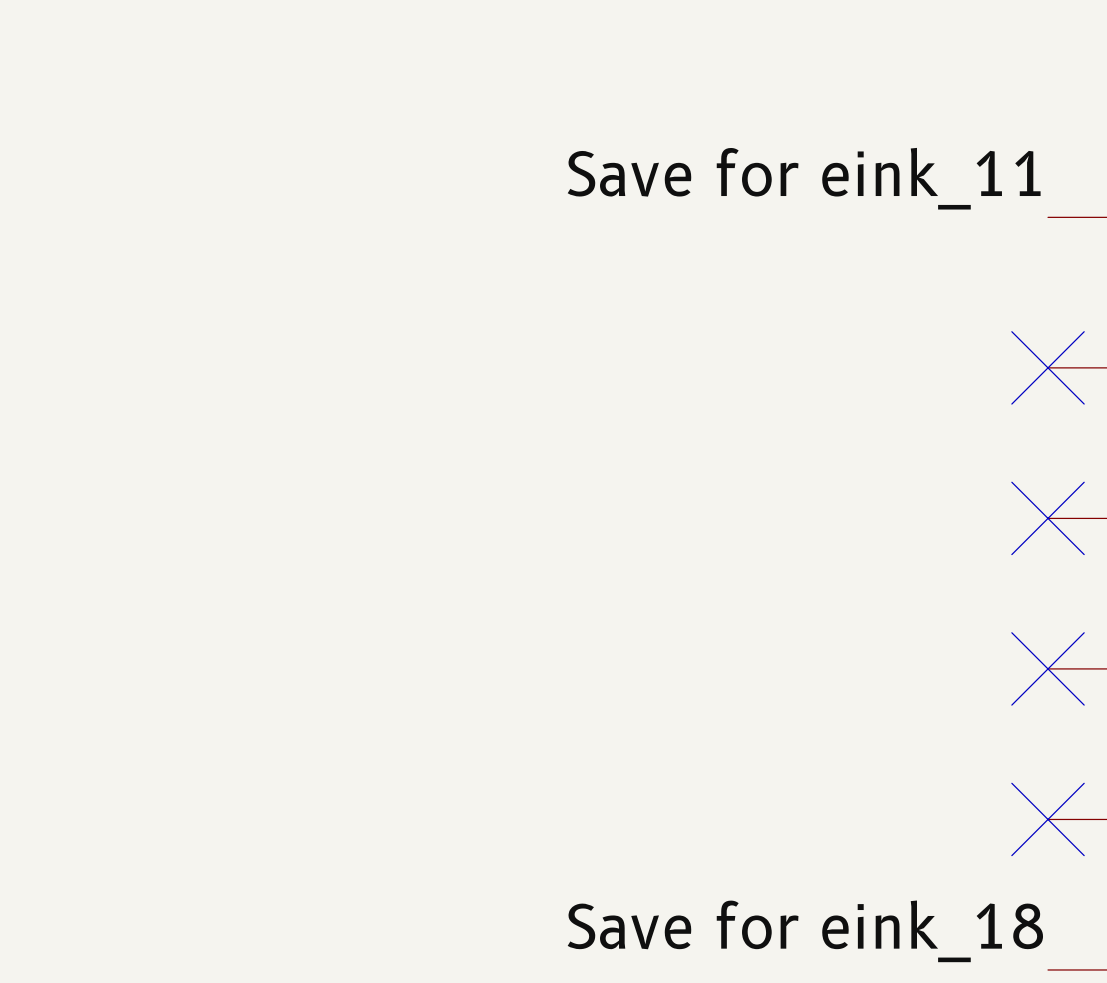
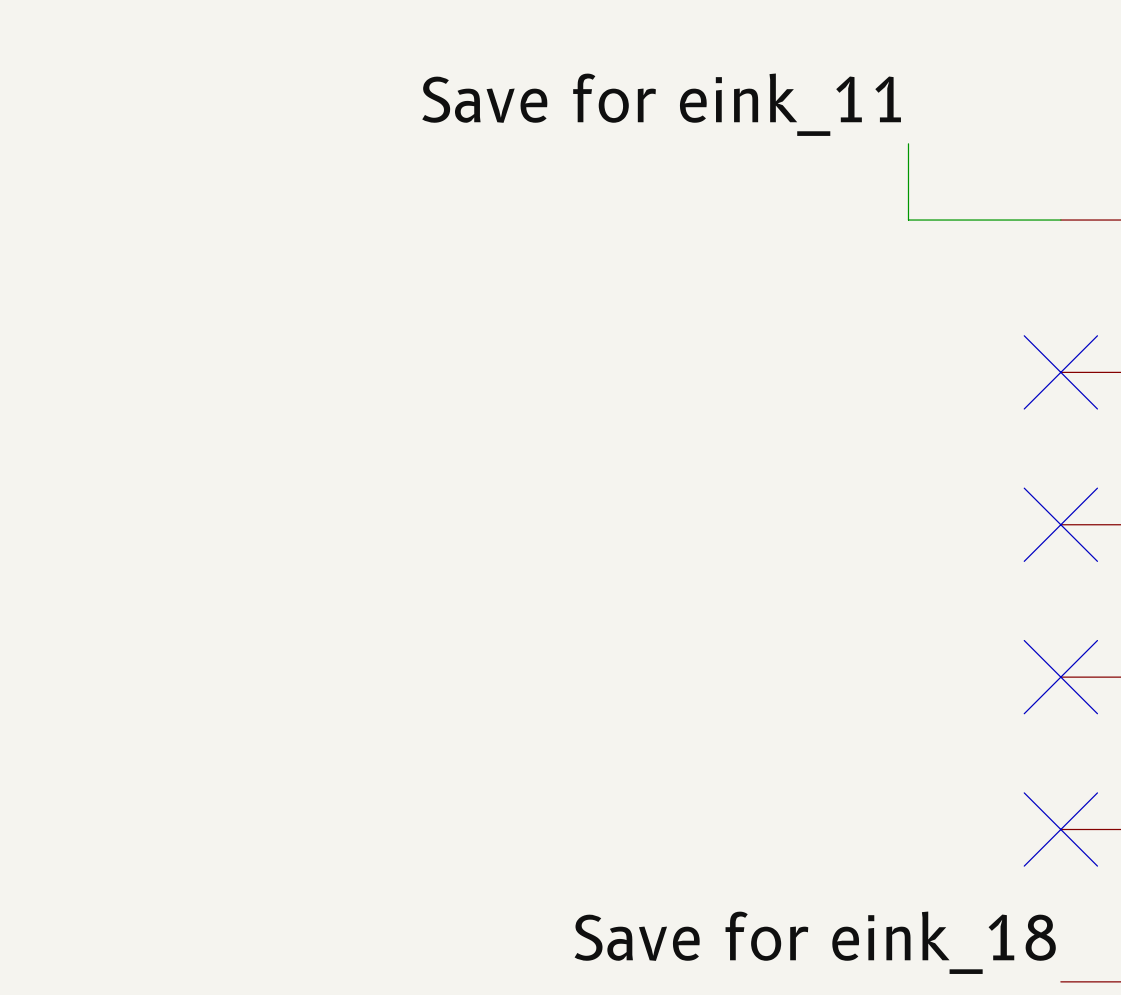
wire: none -> (908, 143) (908, 220) (1060, 220)
label position: Save for eink_11 (804, 178) -> Save for eink_11 (661, 104)

